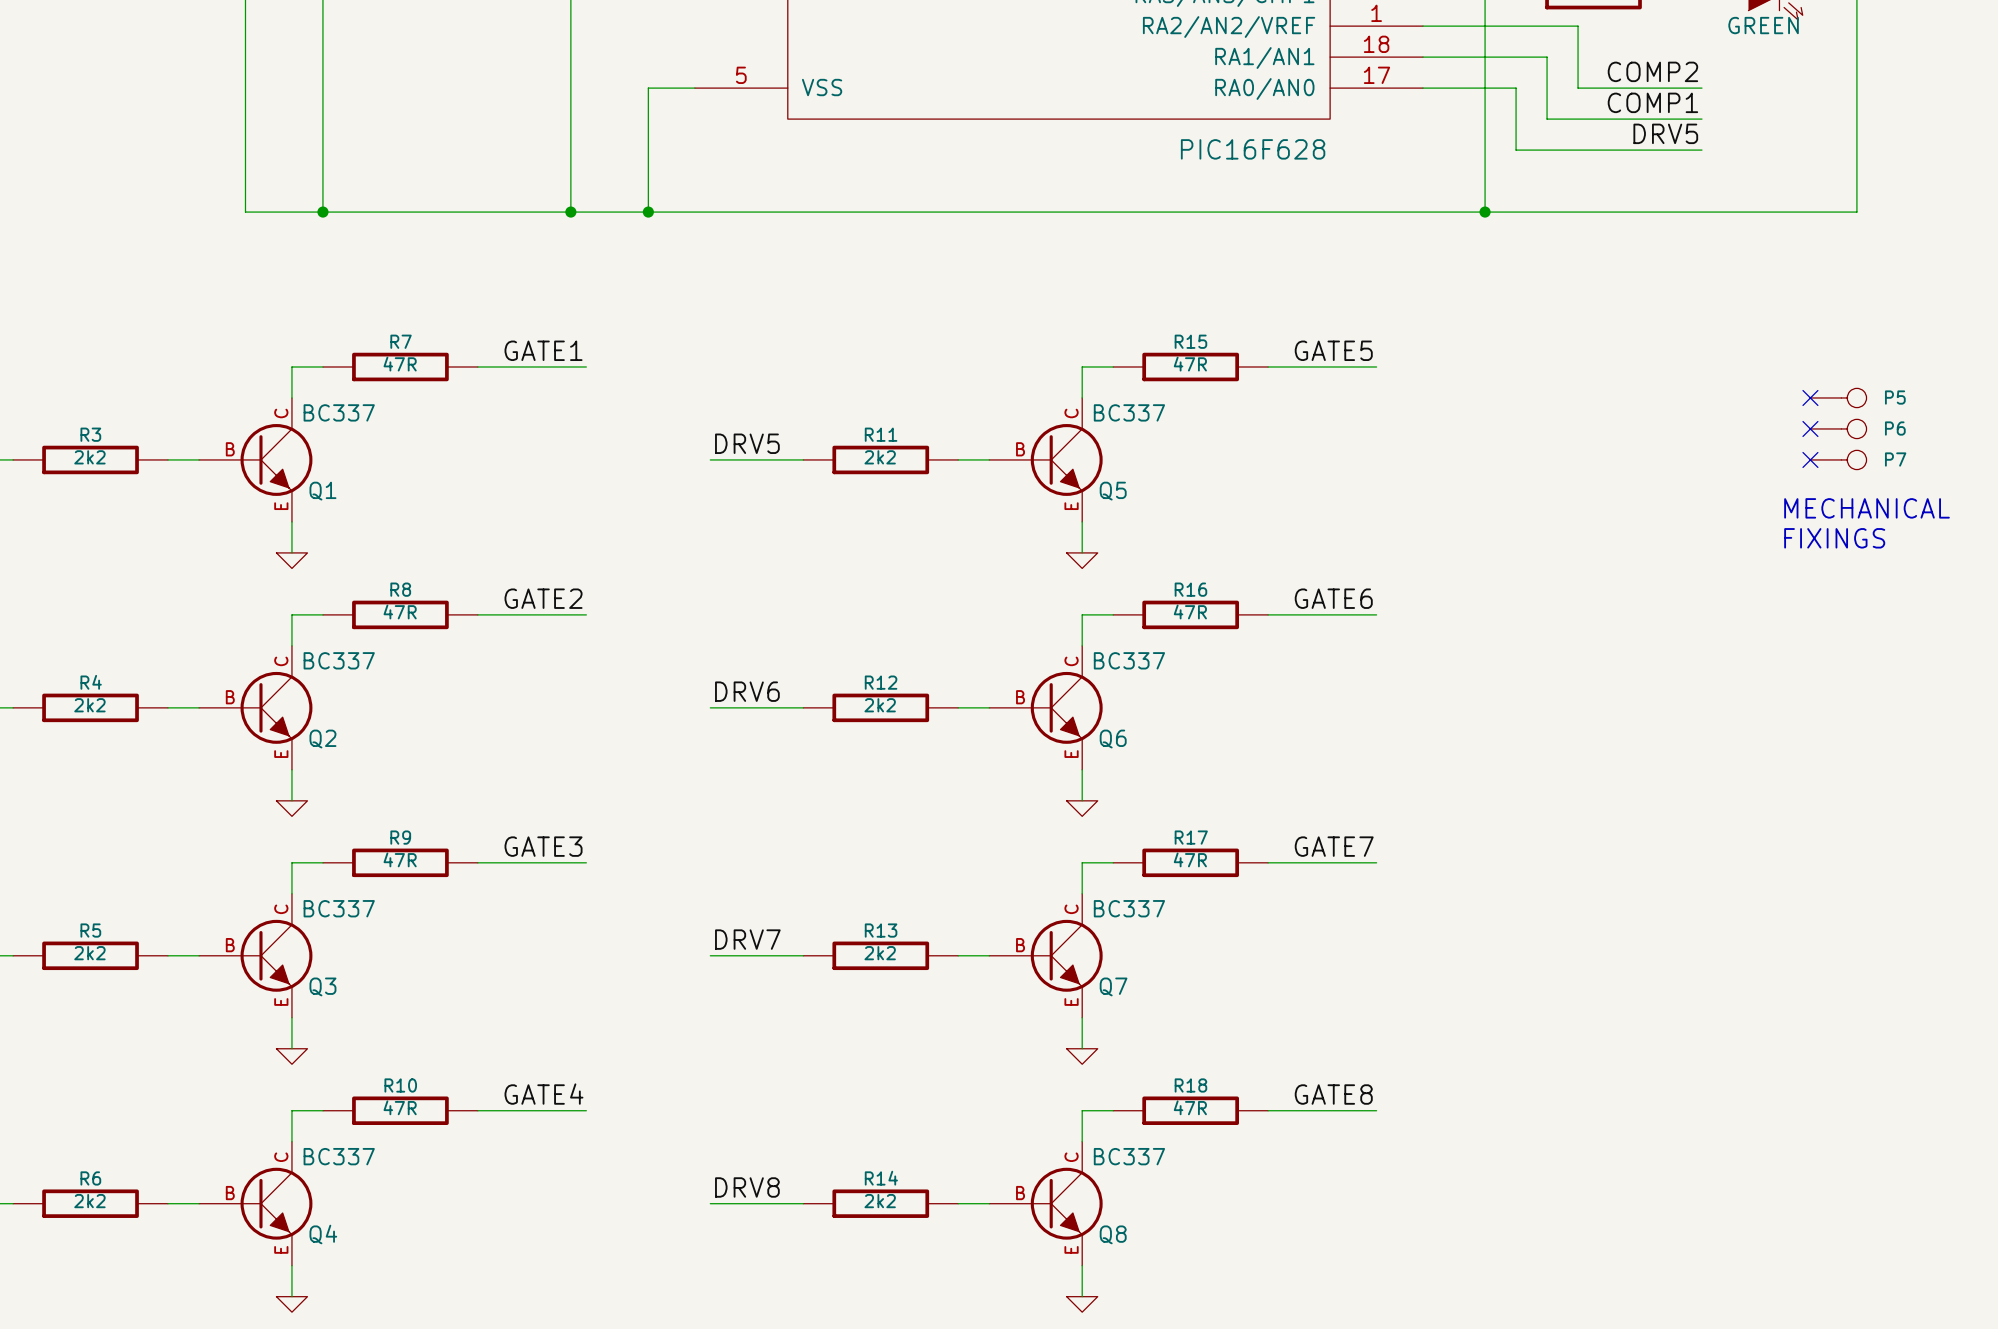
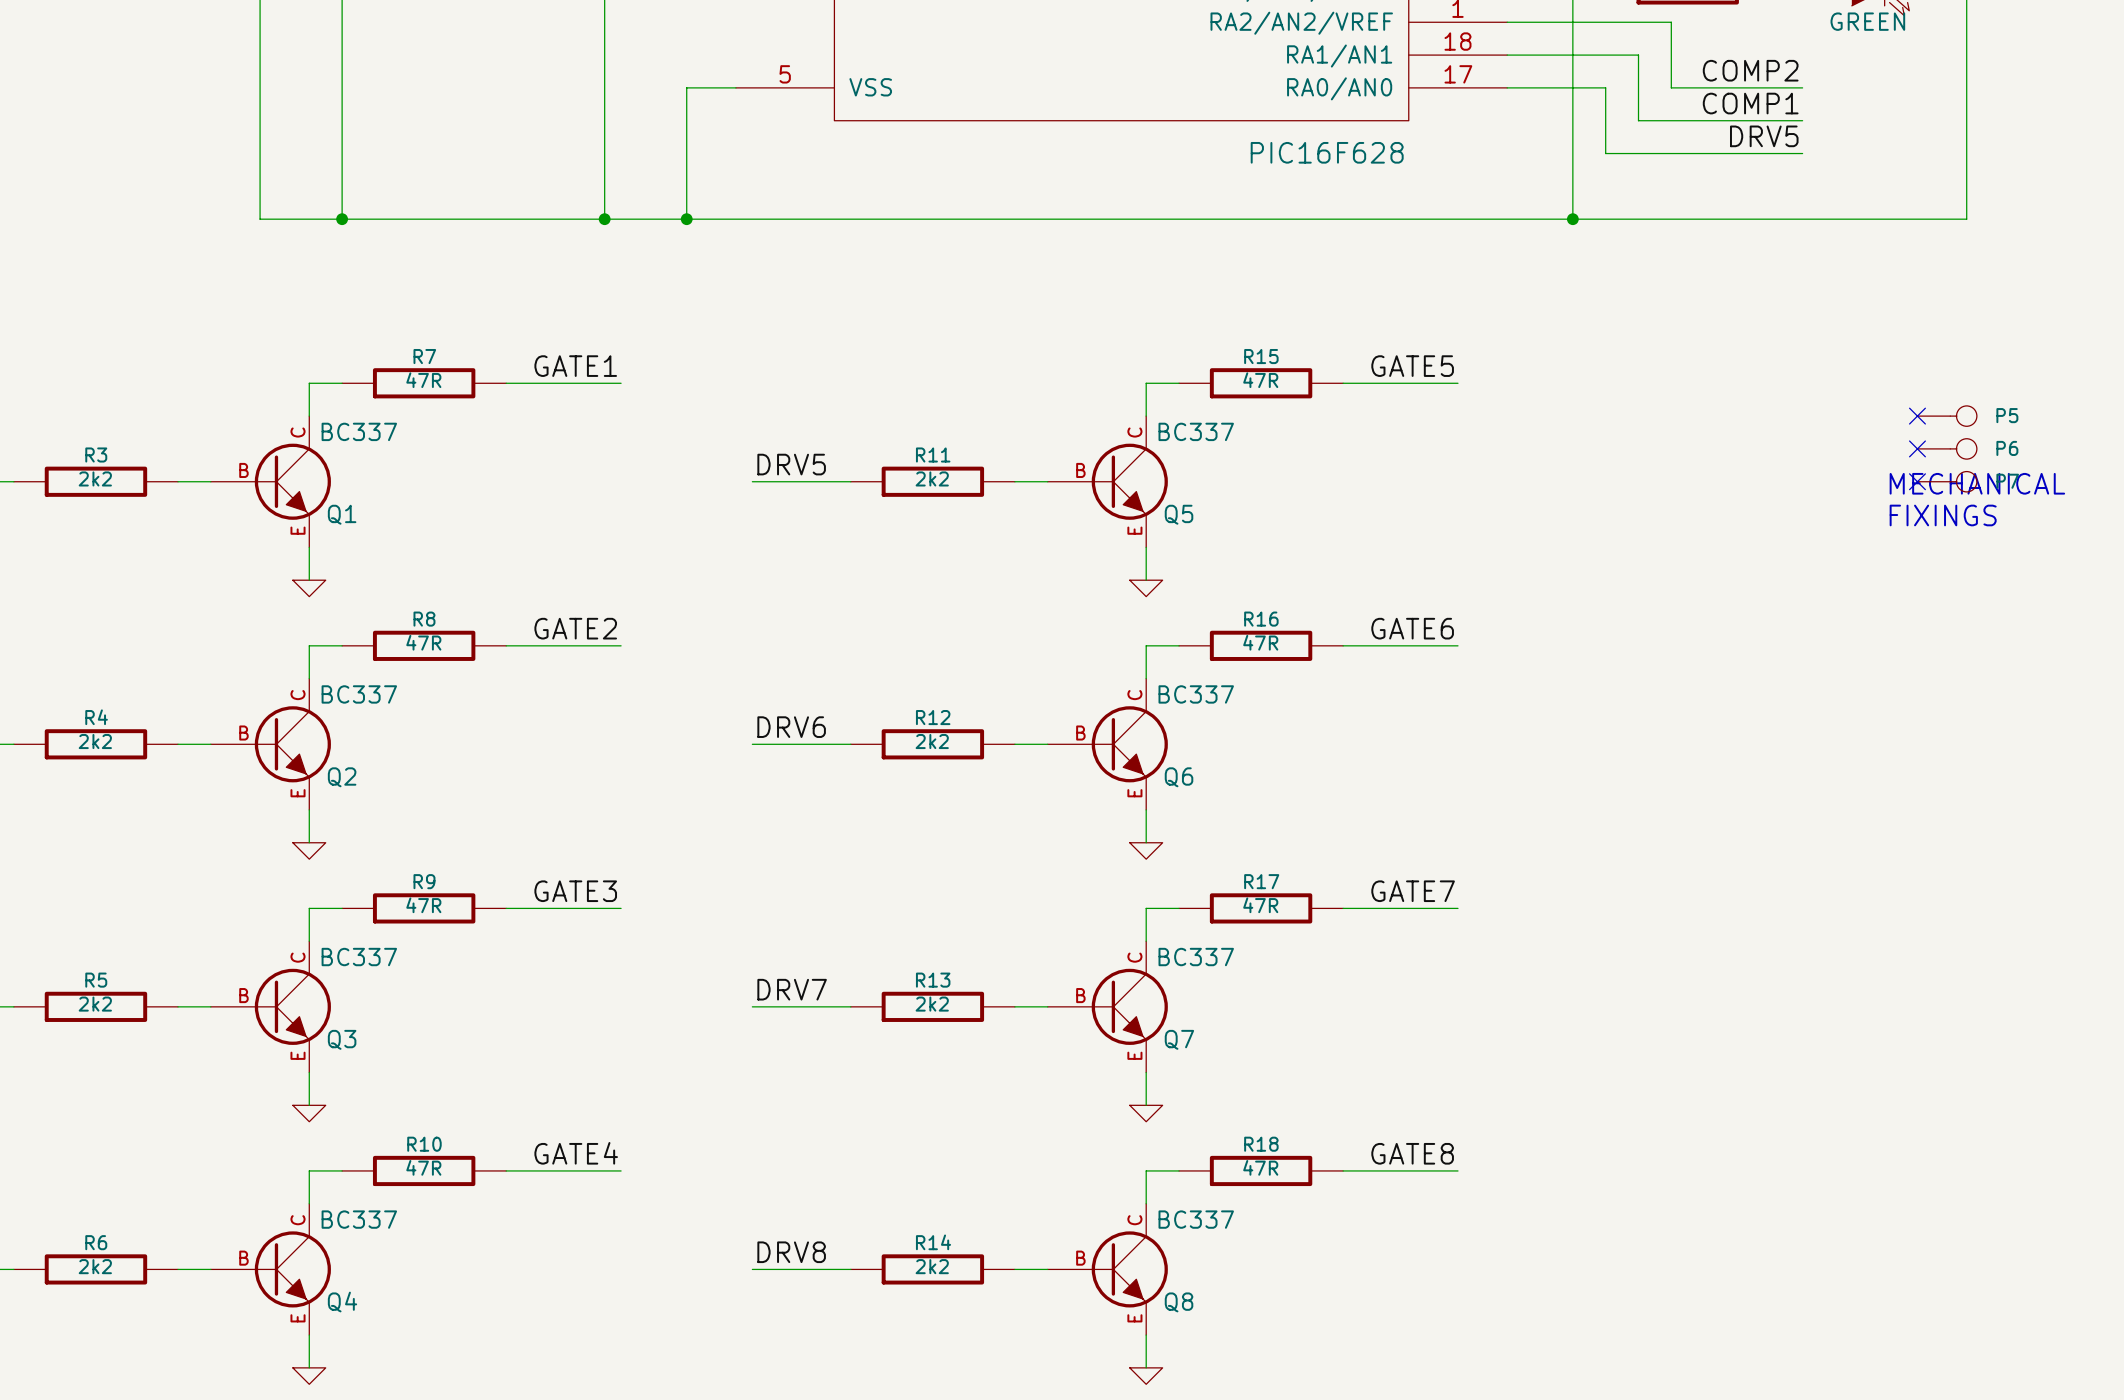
text position: MECHANICAL (1867, 508) -> MECHANICAL (1977, 483)
text position: FIXINGS (1834, 538) -> FIXINGS (1943, 515)

